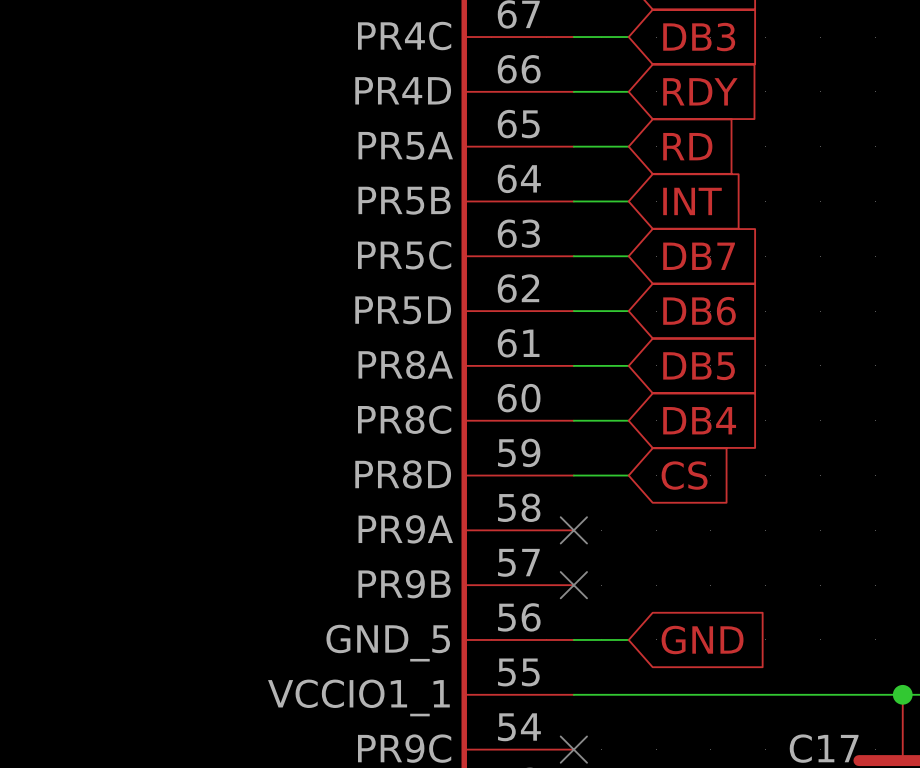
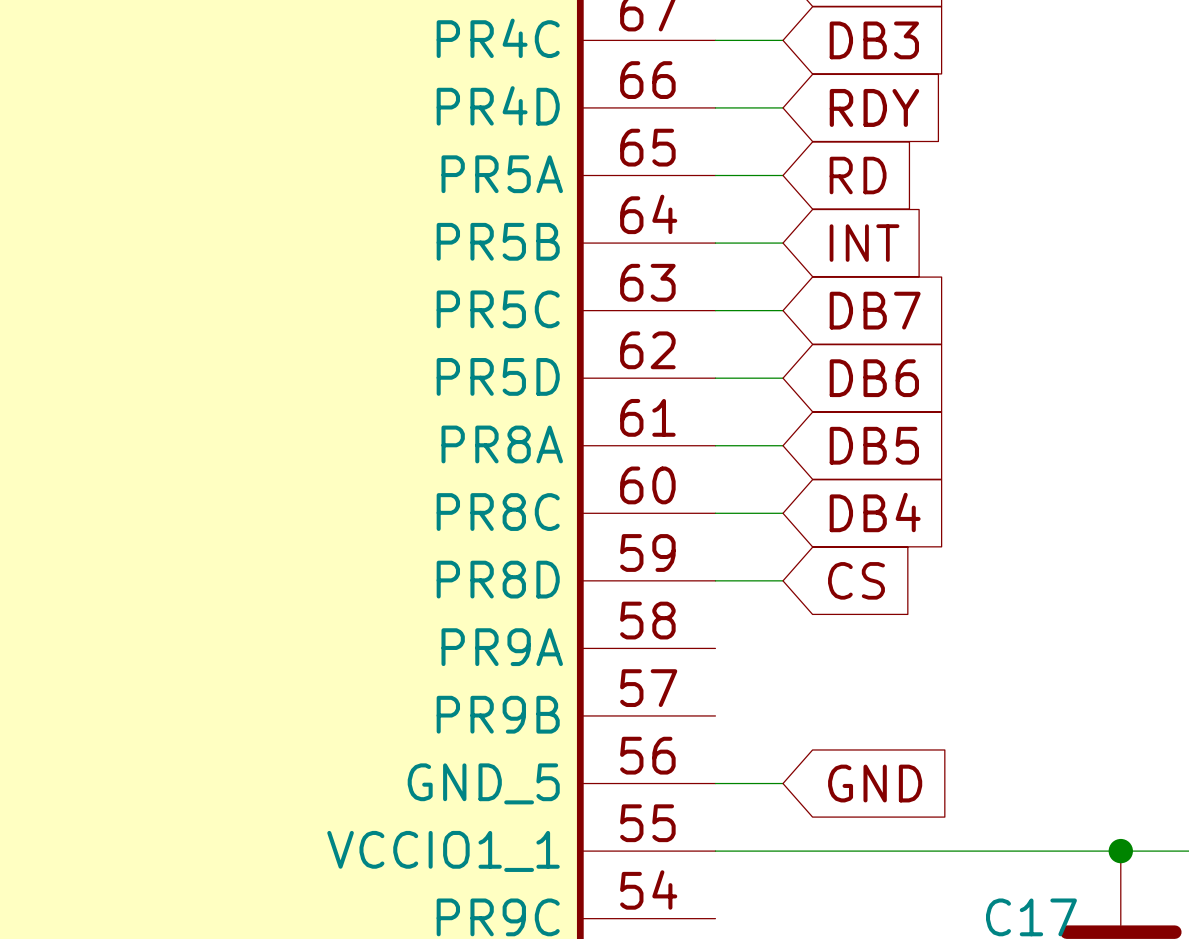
no-connect mark: (573, 530) -> none
no-connect mark: (573, 585) -> none
no-connect mark: (573, 749) -> none

